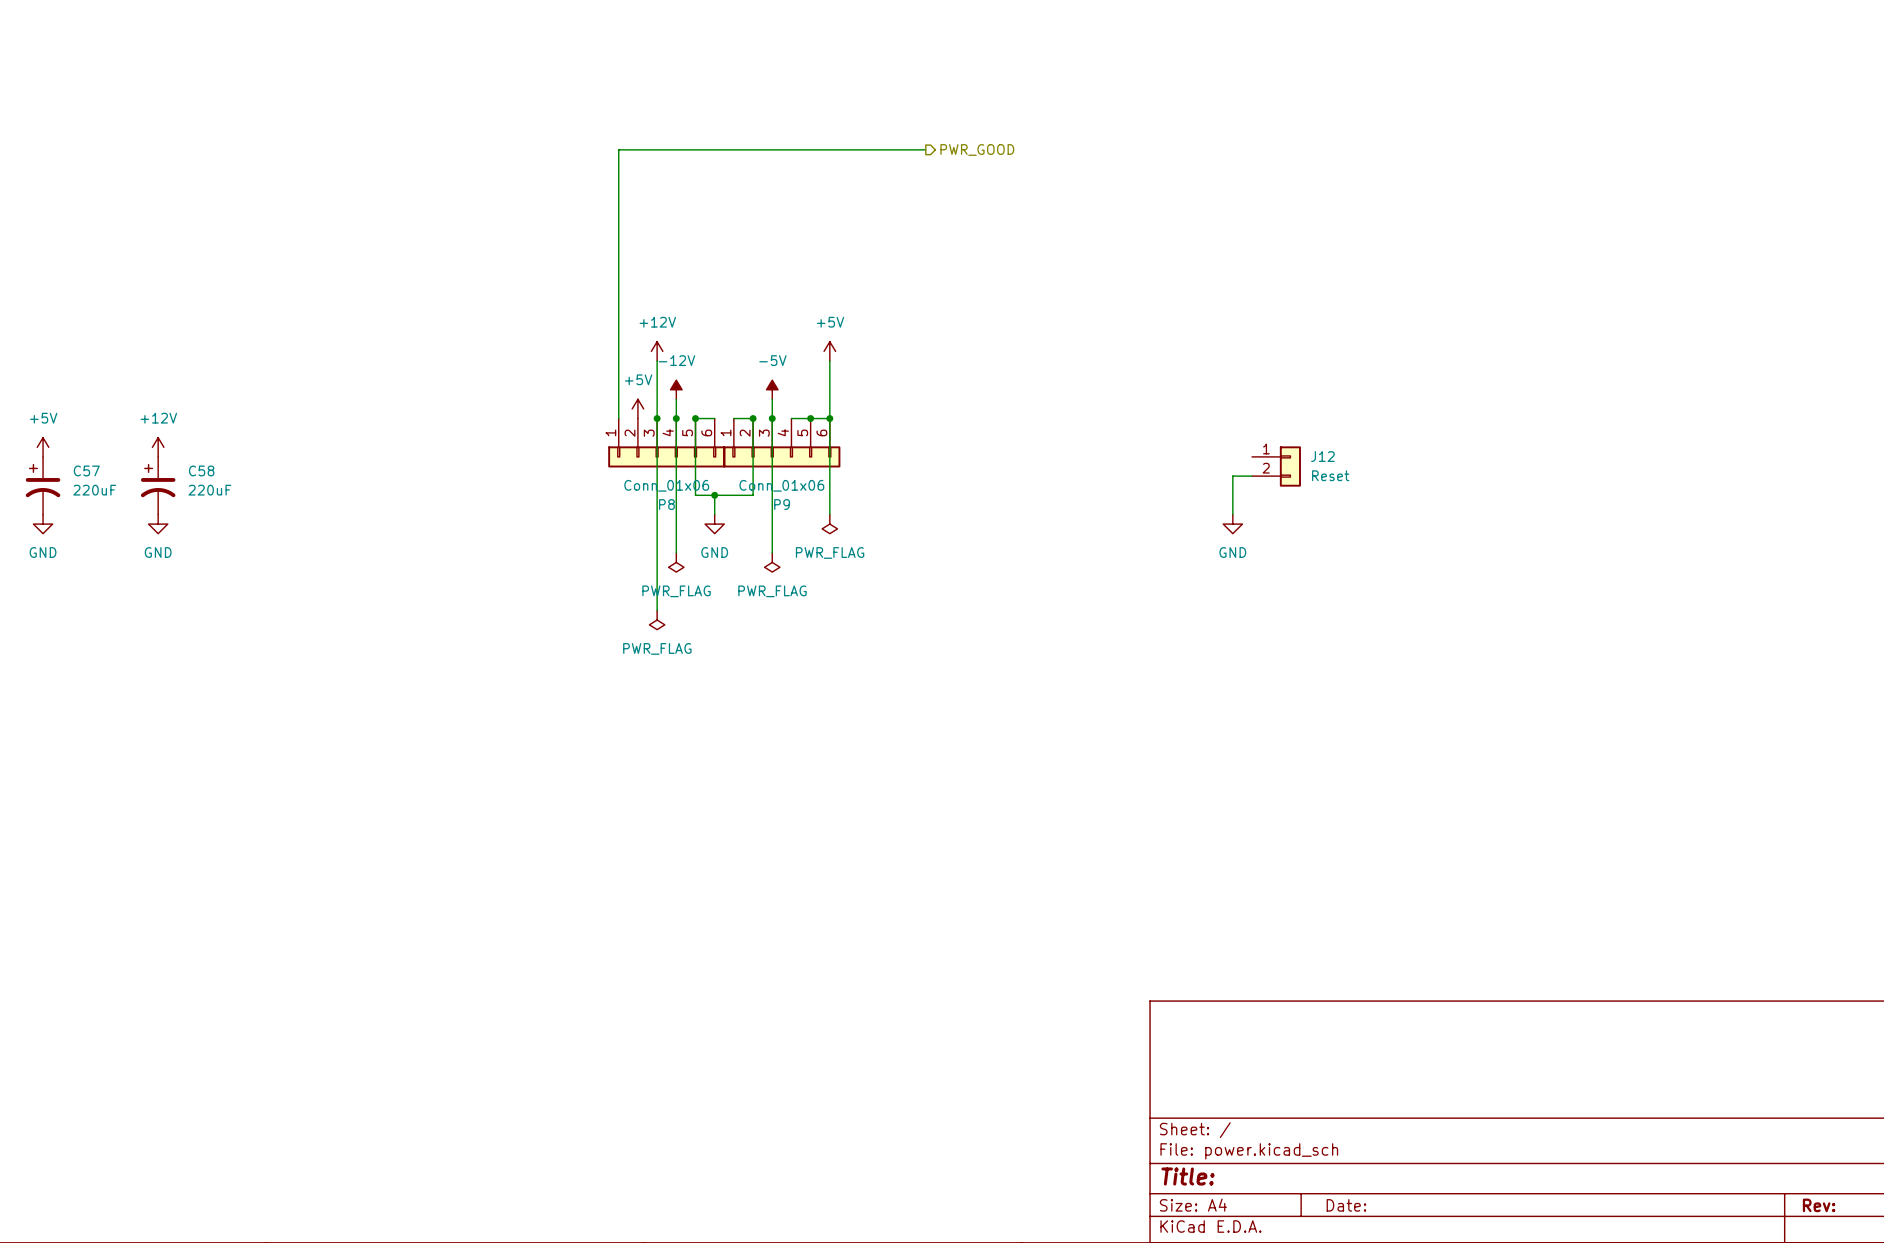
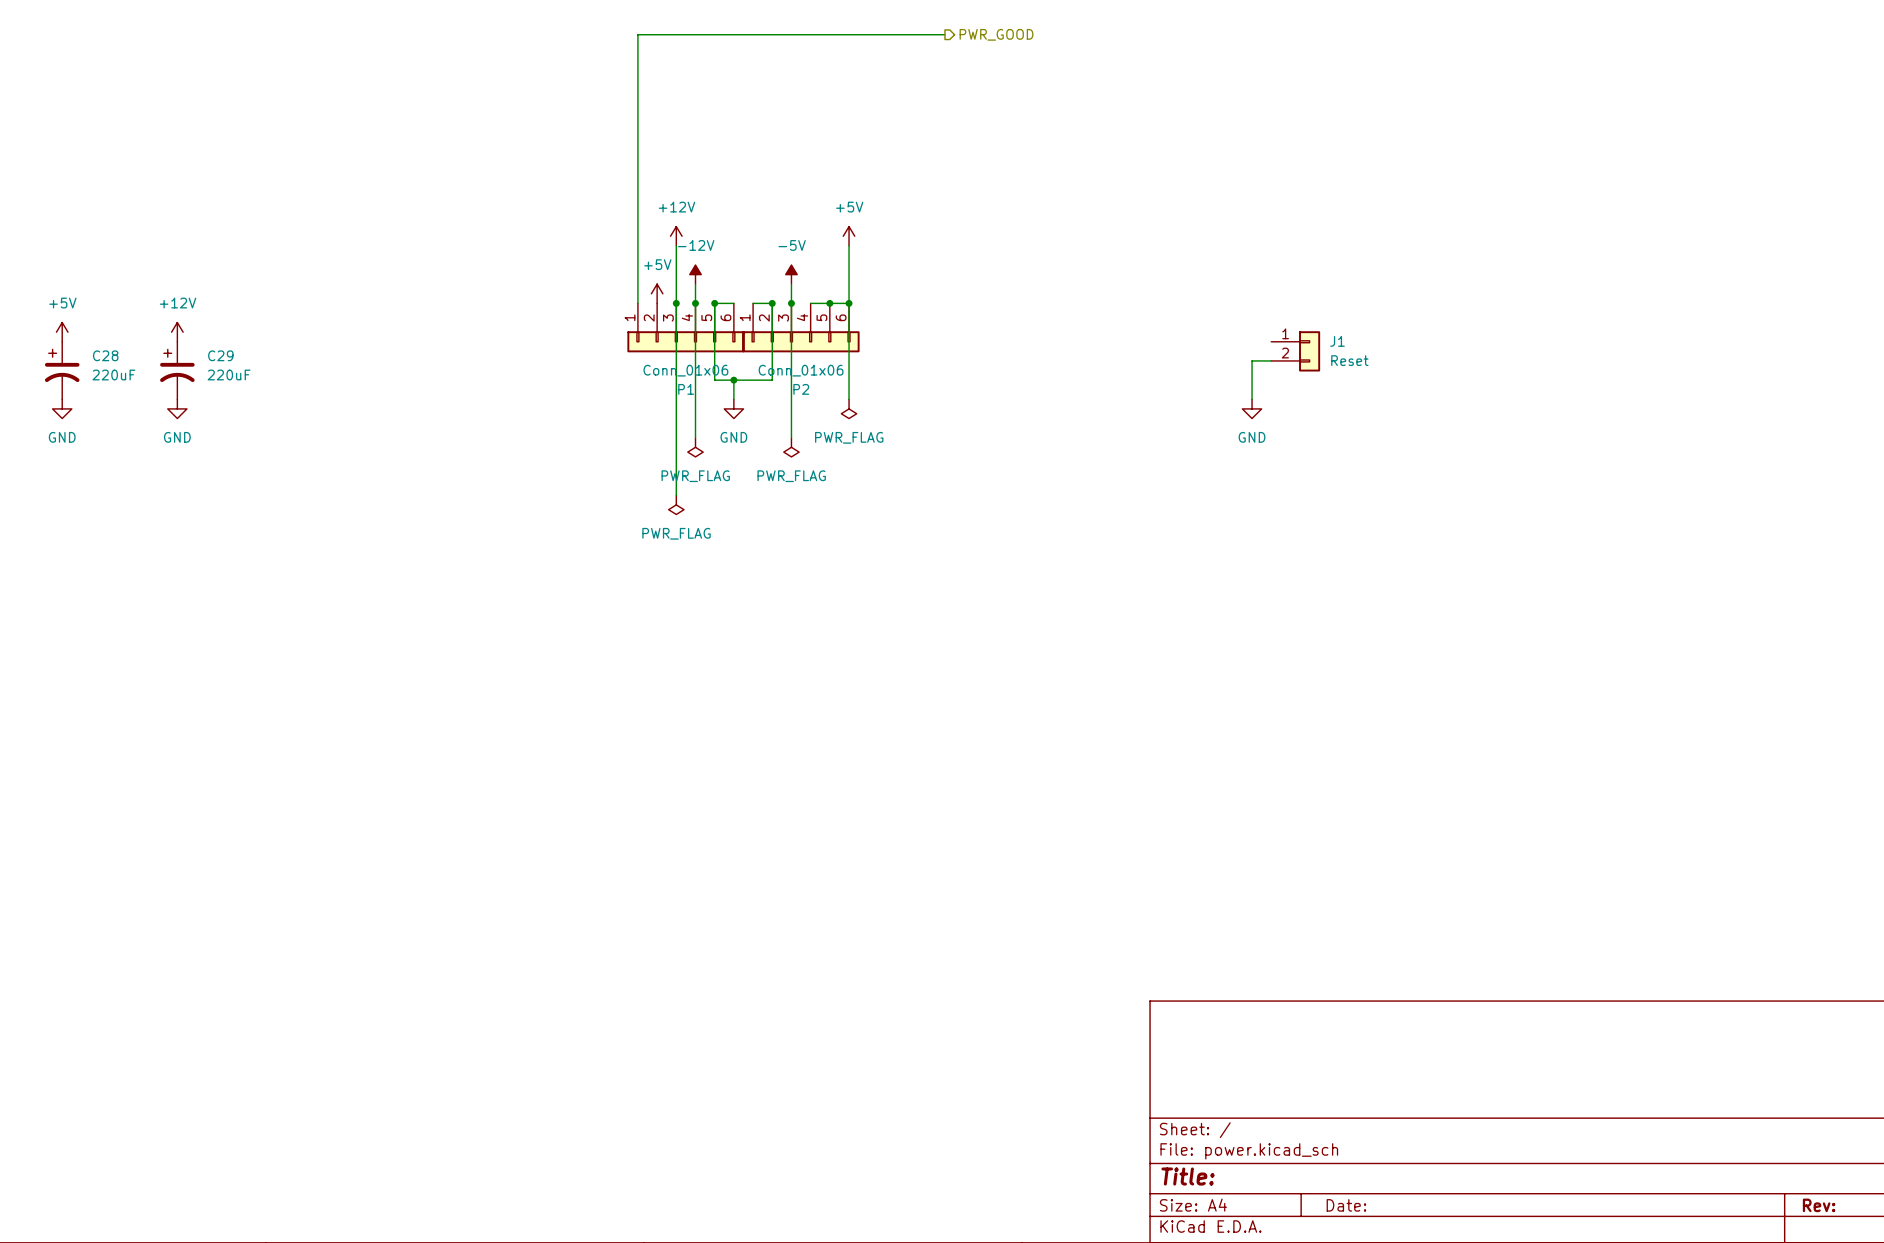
wire: (925, 149) (618, 149) (618, 418) -> (944, 34) (637, 34) (637, 303)
hierarchical label position: PWR_GOOD (977, 149) -> PWR_GOOD (996, 34)
power symbol: none -> +5V (849, 236)
wire: none -> (676, 245) (676, 399)
power symbol: none -> +5V (657, 293)
junction: none -> (676, 303)
junction: none -> (695, 303)
junction: none -> (714, 303)
wire: none -> (733, 303) (714, 303) (714, 380) (772, 380) (772, 303) (753, 303)
junction: none -> (772, 303)
junction: none -> (791, 303)
junction: none -> (829, 303)
junction: none -> (849, 303)
P1: none -> Conn_01x06 (685, 327)
P2: none -> Conn_01x06 (801, 327)
power symbol position: +12V (657, 351) -> +12V (676, 236)
power symbol: +5V (829, 351) -> none
J1: none -> Reset (1295, 351)
wire: (657, 360) (657, 610) -> none
wire: (829, 360) (829, 514) -> (849, 245) (849, 399)
C28: none -> 220uF (62, 370)
C29: none -> 220uF (177, 370)
junction: none -> (733, 380)
power symbol position: -12V (676, 389) -> -12V (695, 274)
power symbol position: -5V (772, 389) -> -5V (791, 274)
wire: (772, 399) (772, 552) -> (791, 284) (791, 437)
power symbol: none -> GND (62, 408)
power symbol: none -> GND (177, 408)
power symbol: +5V (637, 408) -> none
power symbol: none -> PWR_FLAG (849, 408)
junction: (657, 418) -> none
junction: (676, 418) -> none
wire: (695, 418) (714, 418) -> (695, 418) (695, 284)
junction: (695, 418) -> none
wire: (733, 418) (753, 418) (753, 495) (695, 495) (695, 437) -> none
junction: (753, 418) -> none
junction: (772, 418) -> none
wire: (791, 418) (829, 418) -> (810, 303) (849, 303)
junction: (810, 418) -> none
junction: (829, 418) -> none
P8: Conn_01x06 (666, 443) -> none
P9: Conn_01x06 (781, 443) -> none
power symbol position: +5V (43, 447) -> +5V (62, 332)
power symbol position: +12V (158, 447) -> +12V (177, 332)
power symbol: none -> PWR_FLAG (695, 447)
power symbol: none -> PWR_FLAG (791, 447)
J12: Reset (1276, 466) -> none
wire: (1252, 476) (1232, 476) (1232, 514) -> (1271, 360) (1252, 360) (1252, 399)
C57: 220uF (43, 485) -> none
C58: 220uF (158, 485) -> none
wire: (676, 495) (676, 552) -> none
wire: (714, 495) (714, 514) -> (733, 380) (733, 399)
junction: (714, 495) -> none
power symbol: none -> PWR_FLAG (676, 504)
power symbol: GND (43, 524) -> none
power symbol: GND (158, 524) -> none
power symbol position: GND (714, 524) -> GND (733, 408)
power symbol: PWR_FLAG (829, 524) -> none
power symbol position: GND (1232, 524) -> GND (1252, 408)
power symbol: PWR_FLAG (676, 562) -> none
power symbol: PWR_FLAG (772, 562) -> none
power symbol: PWR_FLAG (657, 620) -> none

